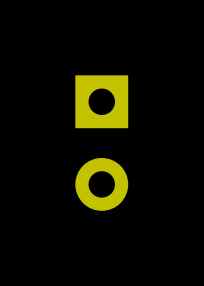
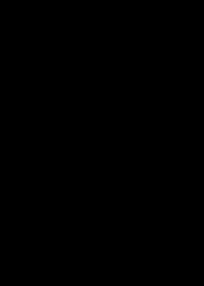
part: (101, 143) -> none

